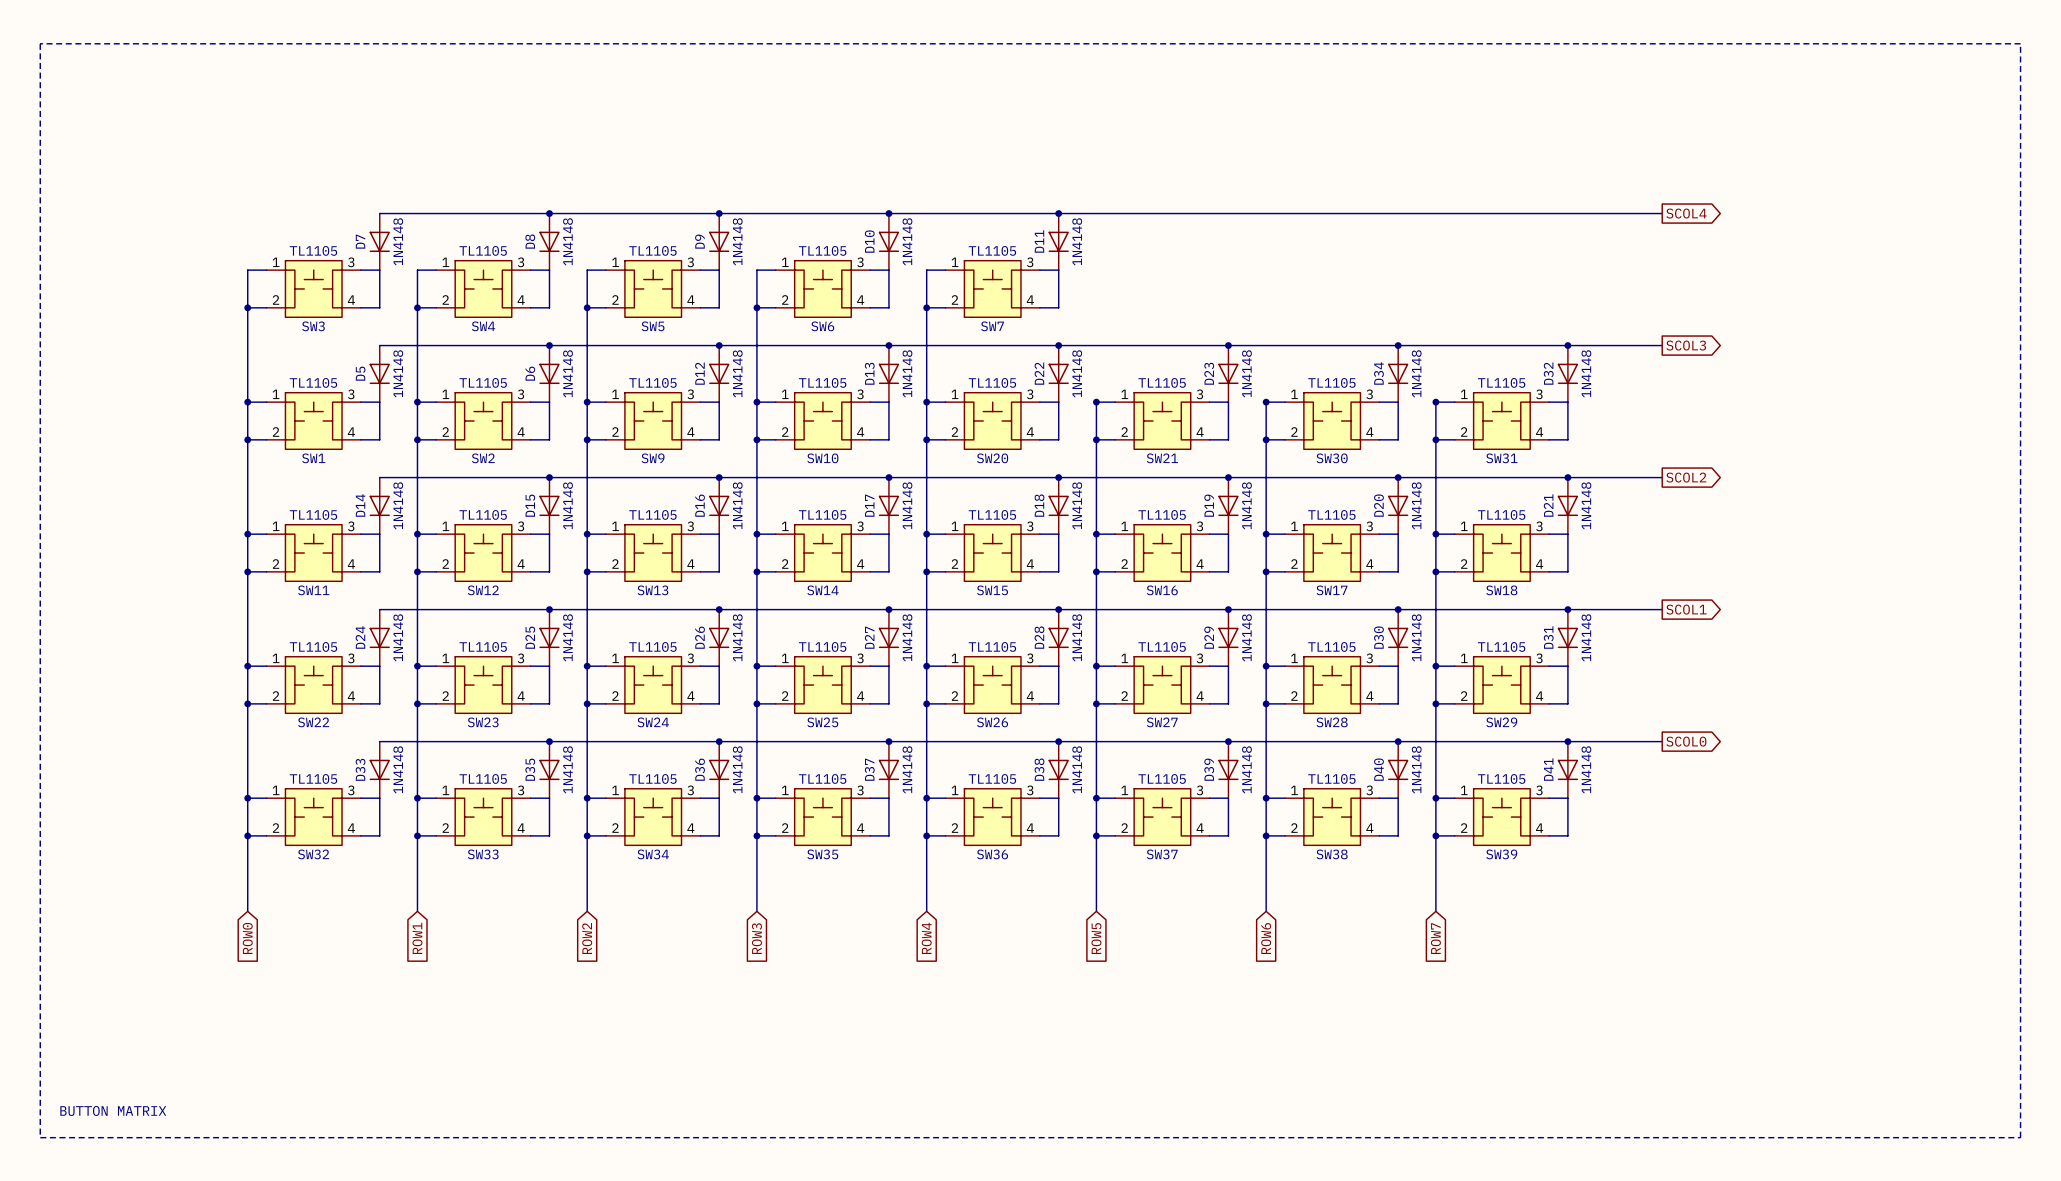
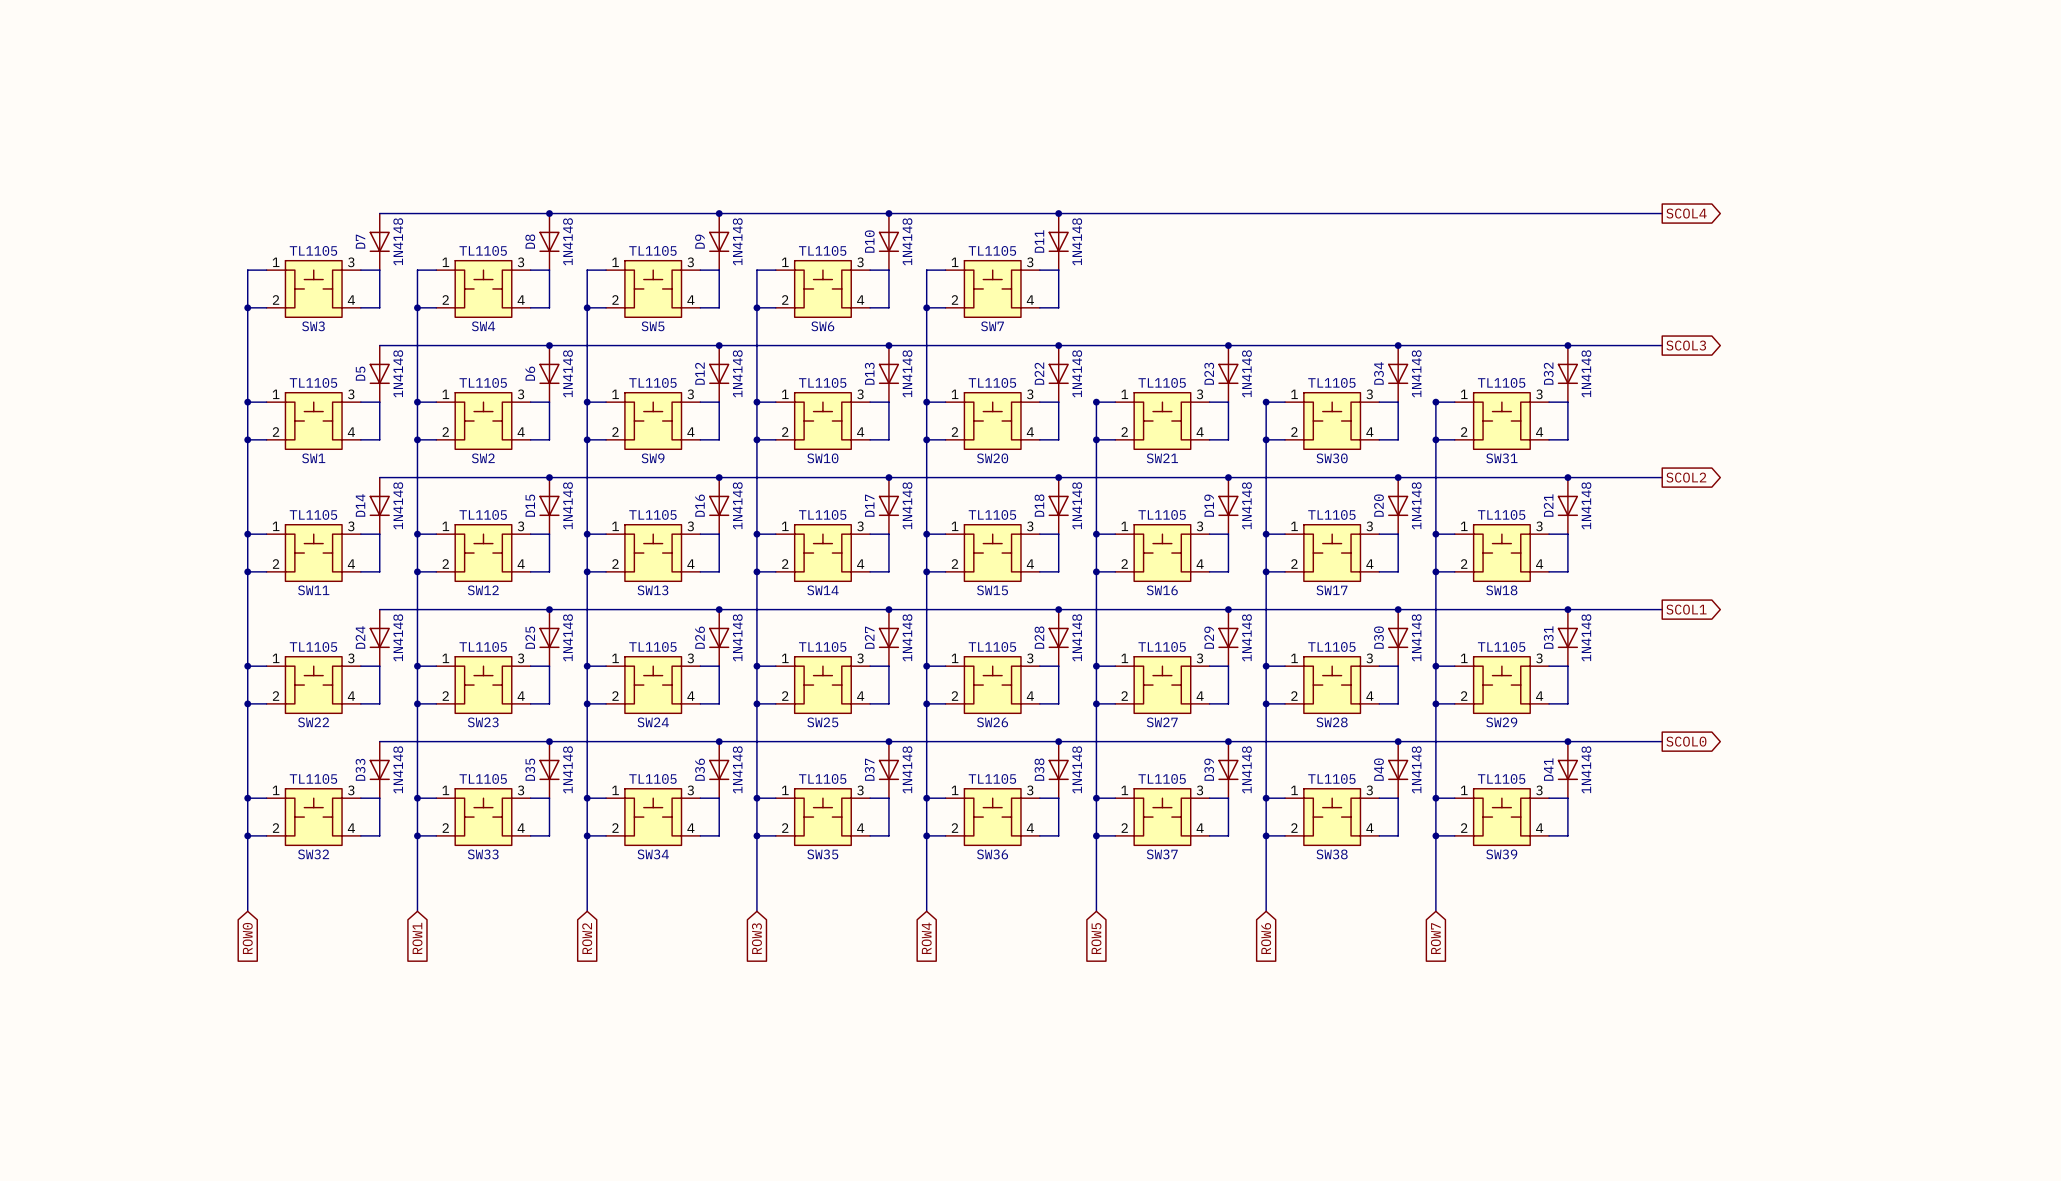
line: (40, 43) (40, 1137) (2020, 1137) (2020, 43) (40, 43) -> none
text: BUTTON MATRIX (113, 1110) -> none

